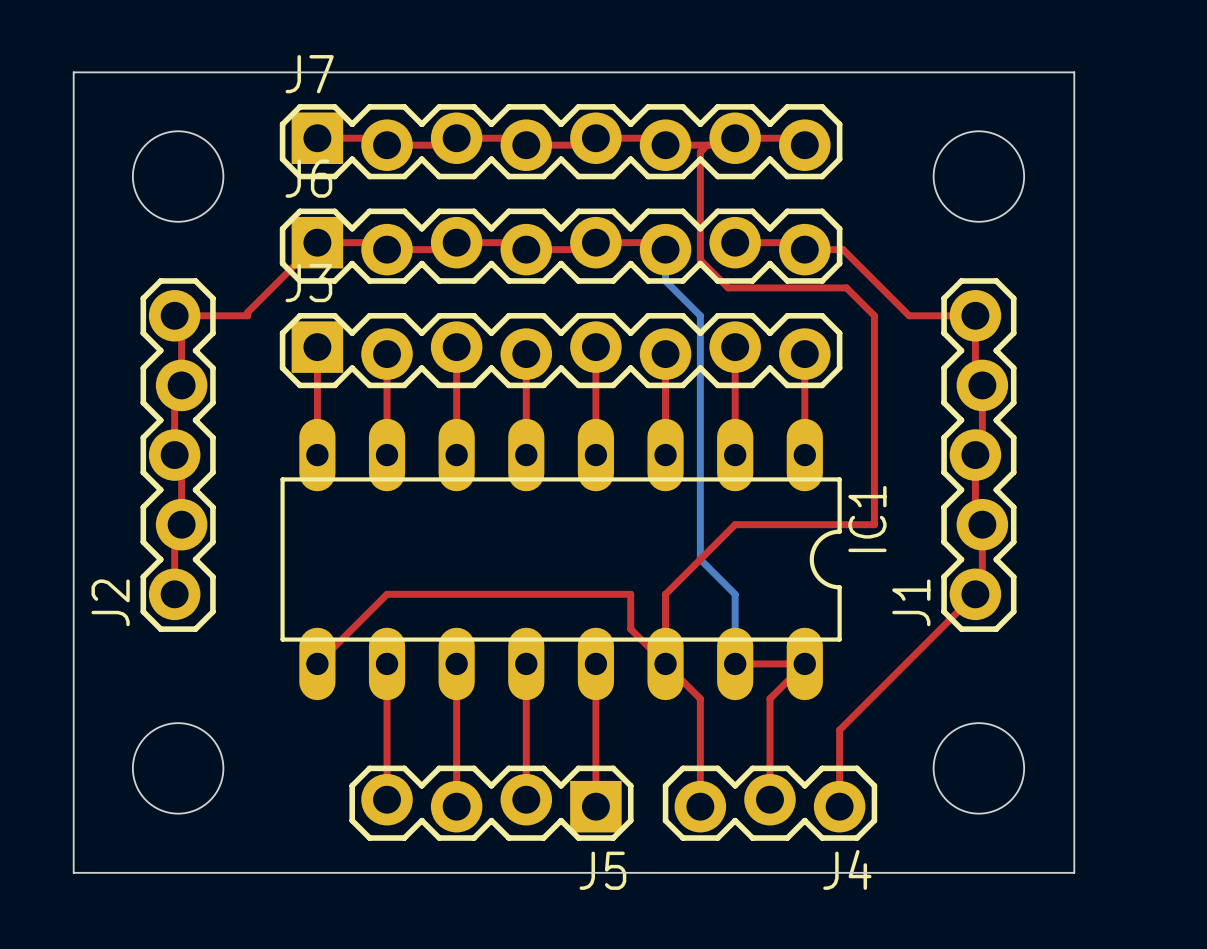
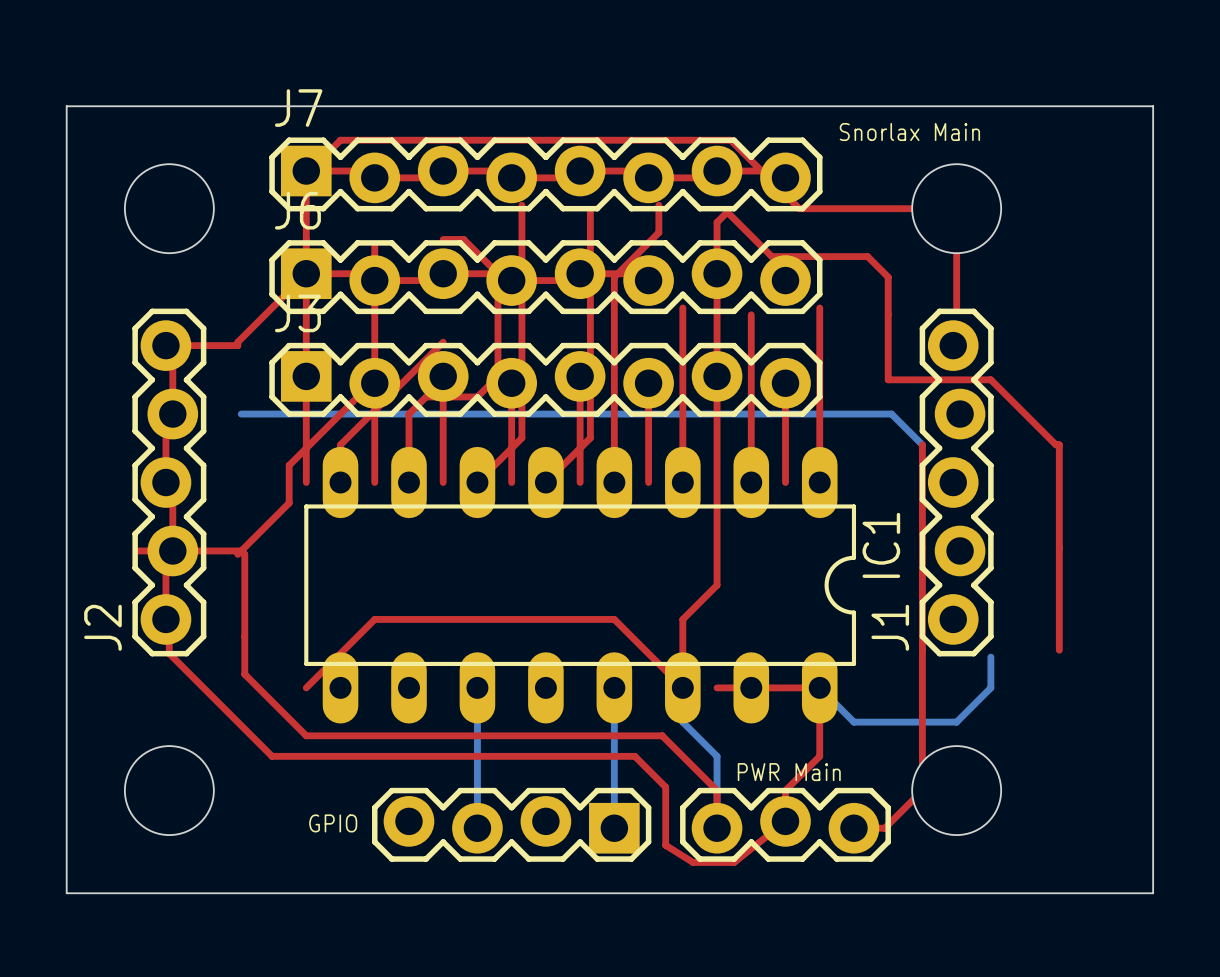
board edge: (1074, 72) (1074, 872) -> (1050, 106) (1153, 106) (1153, 893) (1050, 893)
text: none -> Snorlax Main (909, 132)
top track: (707, 145) (700, 152) (700, 260) (728, 287) (846, 287) (874, 315) (874, 524) (735, 524) (665, 594) (665, 663) -> none
top track: none -> (521, 205) (521, 438) (477, 482)
top track: none -> (658, 205) (658, 232) (614, 277) (614, 482)
top track: none -> (590, 212) (590, 438) (545, 482)
top track: none -> (443, 239) (463, 239) (497, 273) (497, 376) (477, 396) (426, 396) (408, 414) (408, 482)
top track: none -> (374, 246) (374, 379) (289, 465) (289, 503) (237, 554)
top track: (735, 242) (797, 242) (804, 249) (843, 249) (909, 315) (975, 315) (975, 378) (982, 385) (982, 448) (975, 455) (975, 517) (982, 524) (982, 587) (839, 730) -> none
bottom track: (665, 249) (665, 280) (700, 315) (700, 559) (735, 594) (735, 663) -> none
top track: none -> (682, 307) (682, 482)
top track: none -> (819, 307) (819, 482)
top track: none -> (956, 307) (956, 242) (922, 208) (799, 208) (730, 140) (340, 140) (306, 174) (306, 376)
top track: none -> (751, 314) (751, 482)
top track: none -> (443, 342) (340, 444) (340, 482)
top track: none -> (717, 376) (717, 222) (727, 212) (771, 256) (867, 256) (888, 277) (888, 379) (990, 379) (1055, 444) (1059, 444) (1059, 650)
bottom track: none -> (241, 414) (891, 414) (922, 444)
top track: none -> (922, 444) (922, 790) (884, 828) (853, 828)
top track: none -> (138, 550) (241, 550) (244, 554) (244, 674) (306, 735) (662, 735) (717, 790) (717, 828)
IC1 position: (561, 559) -> (580, 585)
top track: (630, 594) (630, 629) (700, 698) (700, 806) -> (614, 619) (682, 687) (682, 619) (717, 585) (717, 482)
bottom track: none -> (990, 657) (990, 687) (956, 722) (853, 722) (819, 687)
top track: (387, 663) (387, 799) -> none
top track: (456, 663) (456, 806) -> none
bottom track: none -> (477, 687) (477, 828)
top track: (526, 663) (526, 799) -> none
top track: (595, 663) (595, 806) -> none
bottom track: none -> (614, 687) (614, 828)
bottom track: none -> (682, 687) (682, 722) (717, 756) (717, 828)
top track: (804, 663) (769, 698) (769, 799) -> (785, 687) (819, 687) (819, 752)
top track: (839, 733) (839, 806) -> (819, 756) (785, 790) (785, 821) (734, 862) (693, 862) (665, 845) (665, 787) (634, 756) (272, 756) (169, 653) (169, 636)
text: none -> PWR Main (789, 772)
text: none -> GPIO (333, 823)
J5: (491, 803) -> none
part: none -> (511, 824)
J4: (769, 803) -> none
part: none -> (785, 824)

